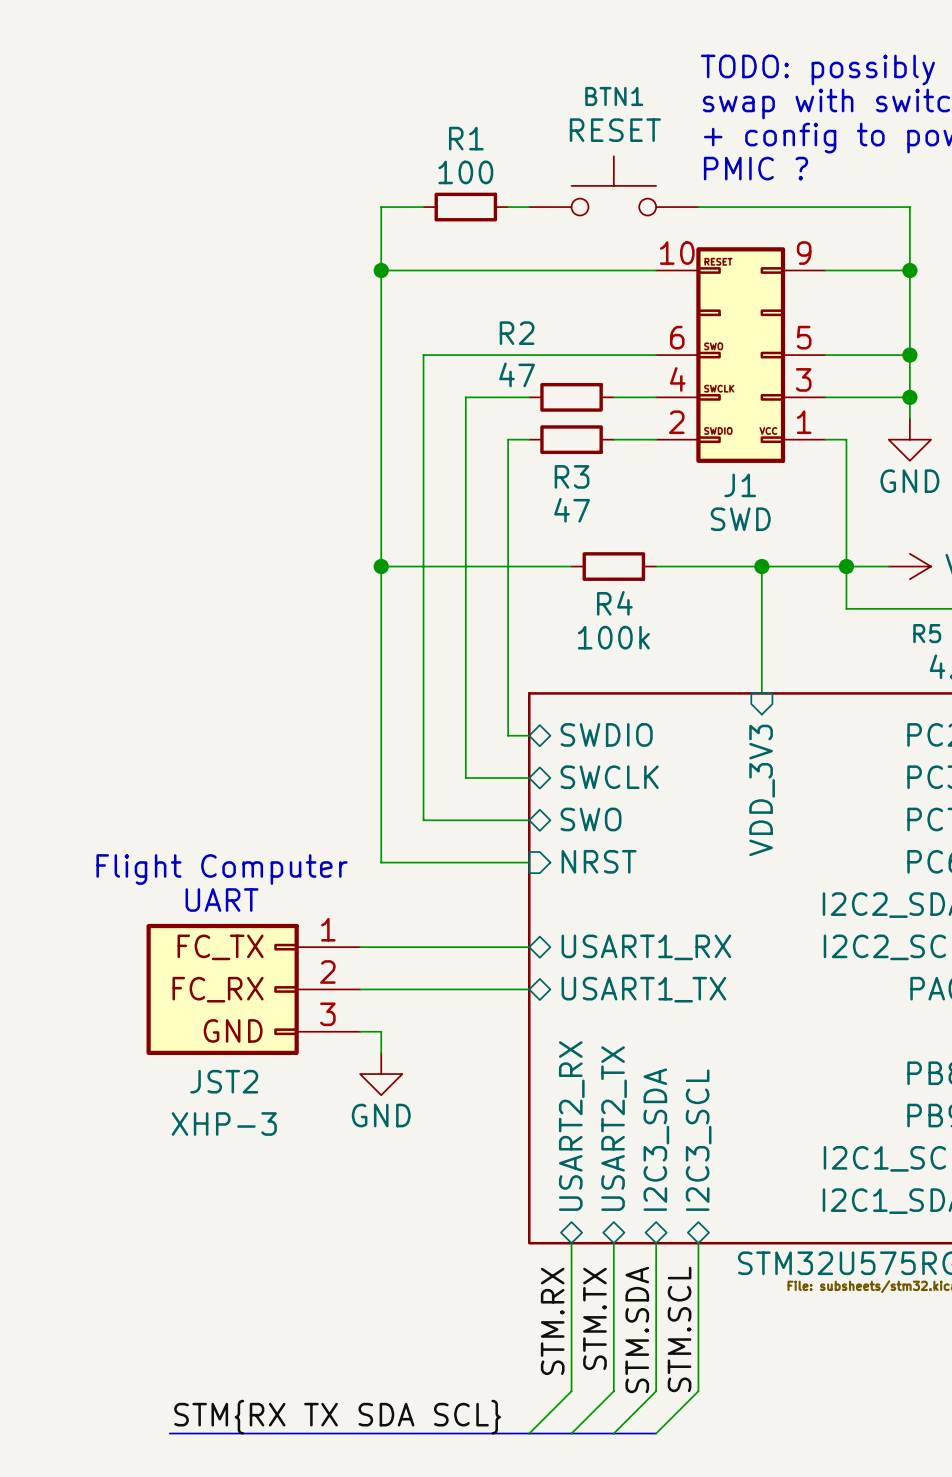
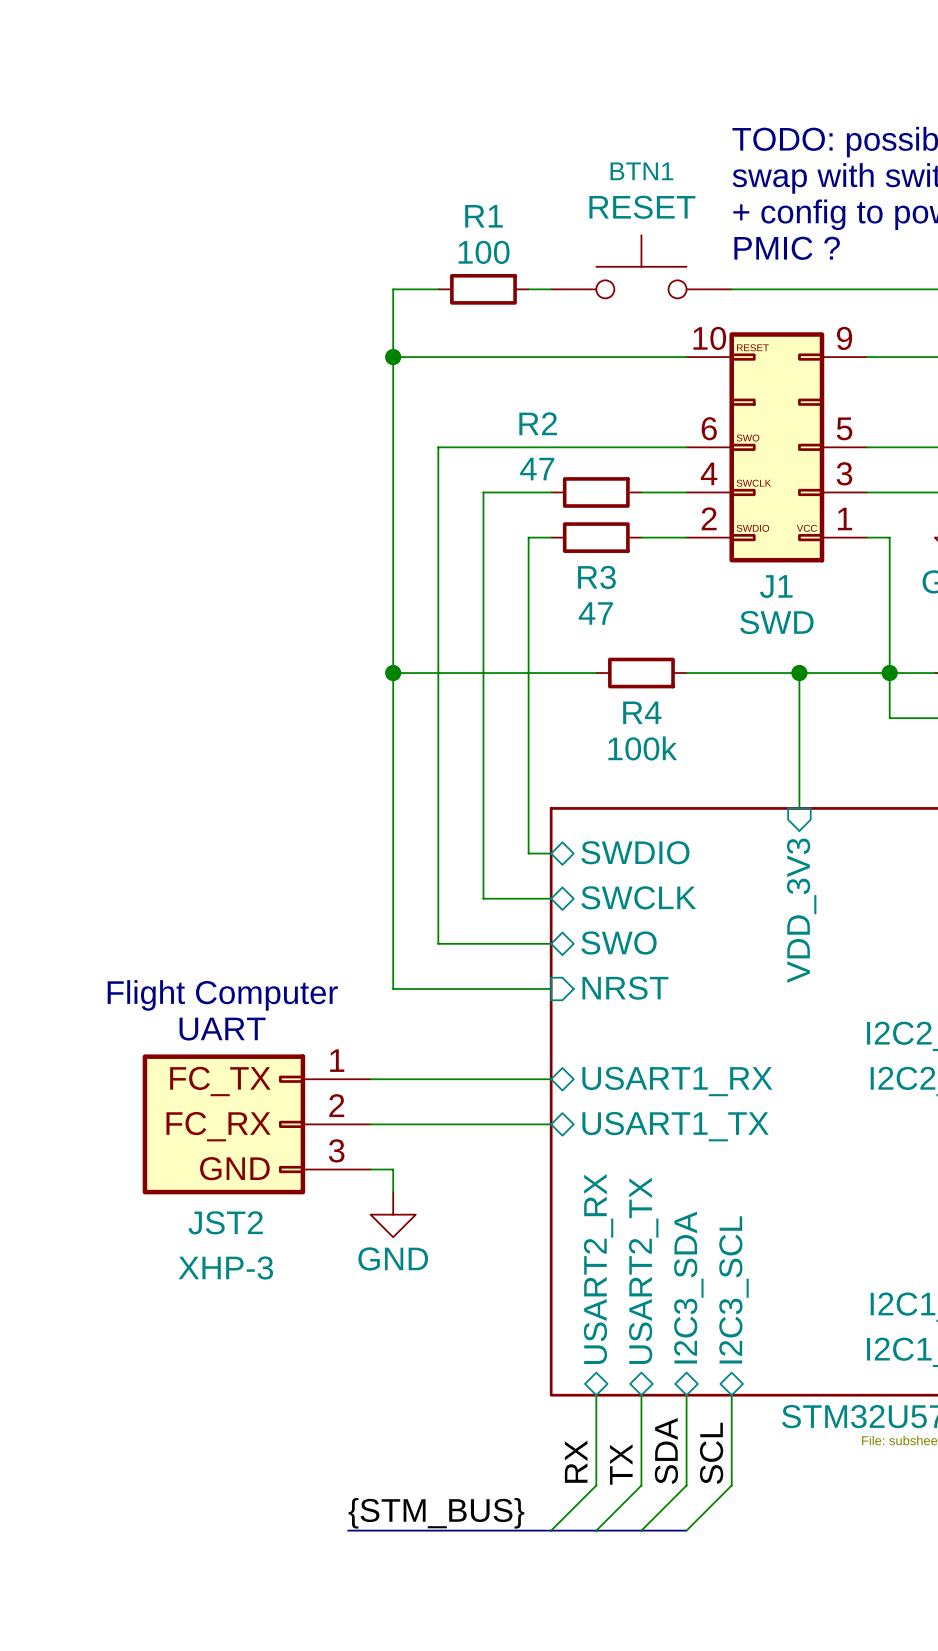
label: none -> SDA (666, 1451)
label: none -> SCL (711, 1453)
label: none -> RX (576, 1461)
label: none -> TX (621, 1464)
label: STM.TX (594, 1318) -> none
label: STM.RX (552, 1321) -> none
wire: (571, 1327) (571, 1391) (529, 1433) -> (596, 1485) (551, 1530)
wire: (613, 1327) (613, 1391) (571, 1433) -> (641, 1485) (596, 1530)
wire: (656, 1327) (656, 1391) (613, 1433) -> (686, 1485) (641, 1530)
wire: (698, 1327) (698, 1391) (656, 1433) -> (731, 1485) (686, 1530)
label: STM.SDA (637, 1329) -> none
label: STM.SCL (679, 1329) -> none
label: none -> {STM_BUS} (436, 1513)
bus: none -> (348, 1530) (686, 1530)
label: STM{RX TX SDA SCL} (337, 1417) -> none
bus: (169, 1433) (656, 1433) -> none

